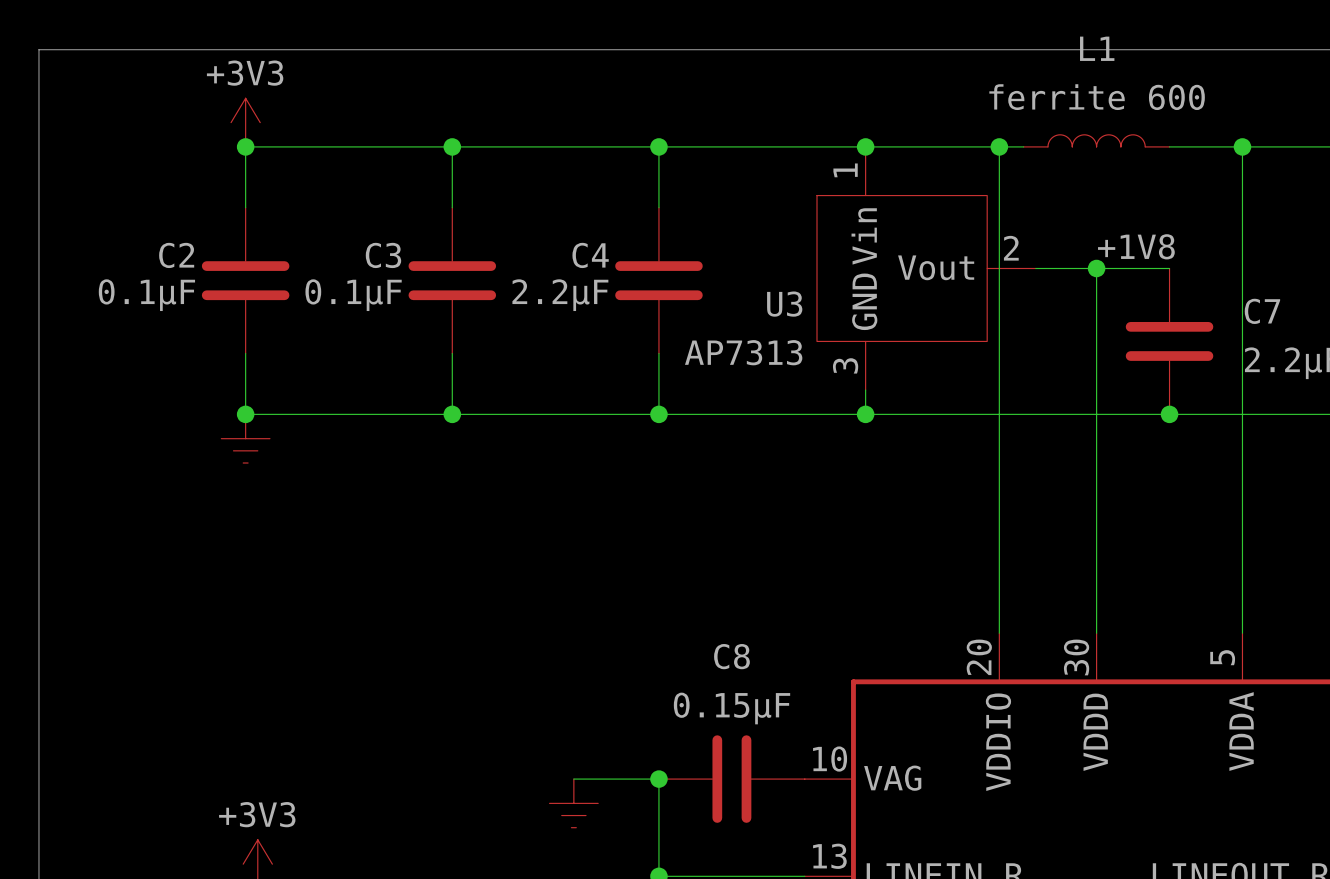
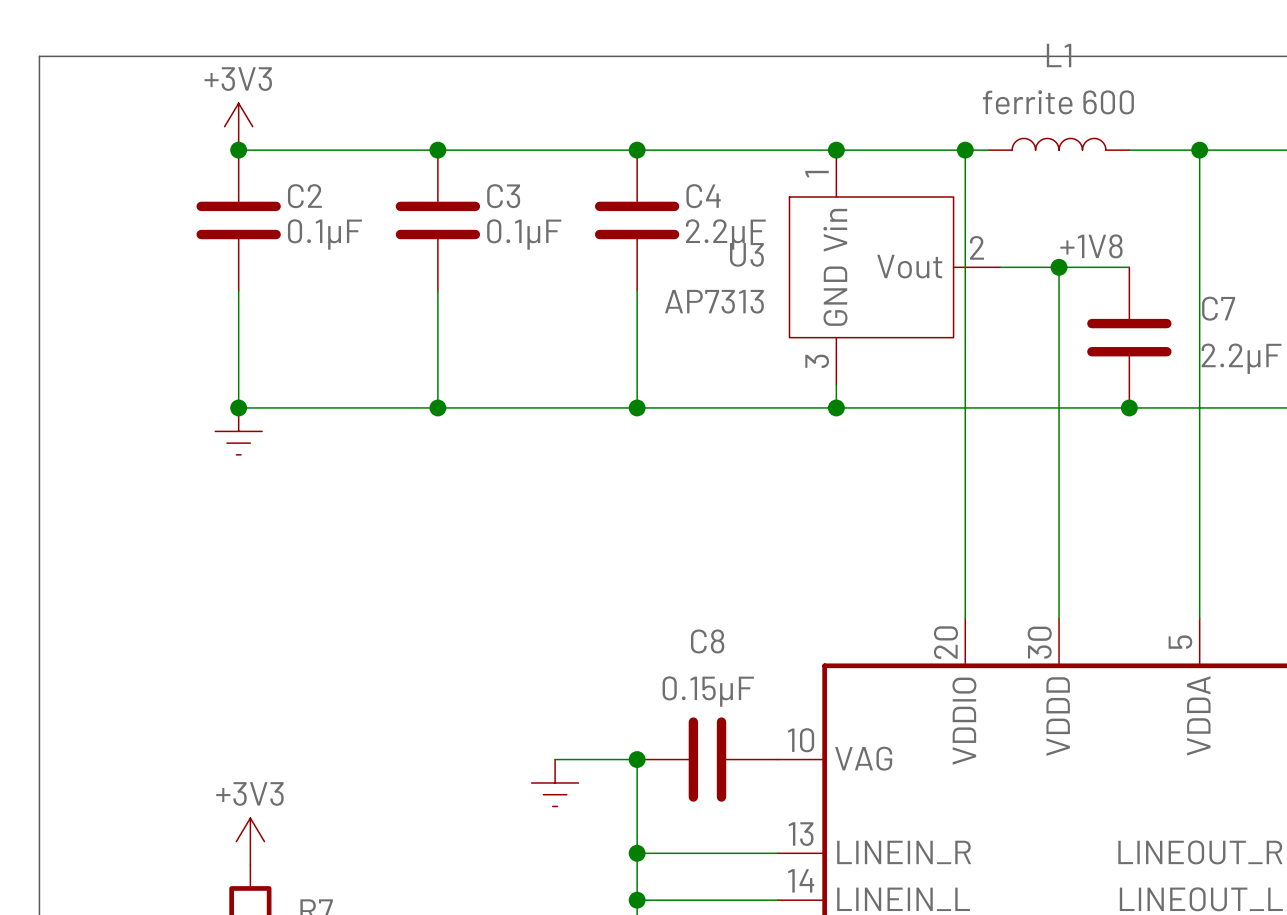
C2 name position: C2 (176, 255) -> C2 (304, 196)
C3 name position: C3 (383, 255) -> C3 (503, 196)
C4 name position: C4 (590, 255) -> C4 (703, 196)
C2 position: (245, 280) -> (238, 220)
C3 position: (452, 280) -> (437, 220)
C4 position: (658, 280) -> (637, 220)
C2 value position: 0.1µF (146, 295) -> 0.1µF (324, 234)
C3 value position: 0.1µF (353, 295) -> 0.1µF (524, 234)
C4 value position: 2.2µF (560, 295) -> 2.2µF (725, 234)
U3 name position: U3 (784, 304) -> U3 (746, 254)
U3 value position: AP7313 (743, 352) -> AP7313 (714, 301)

